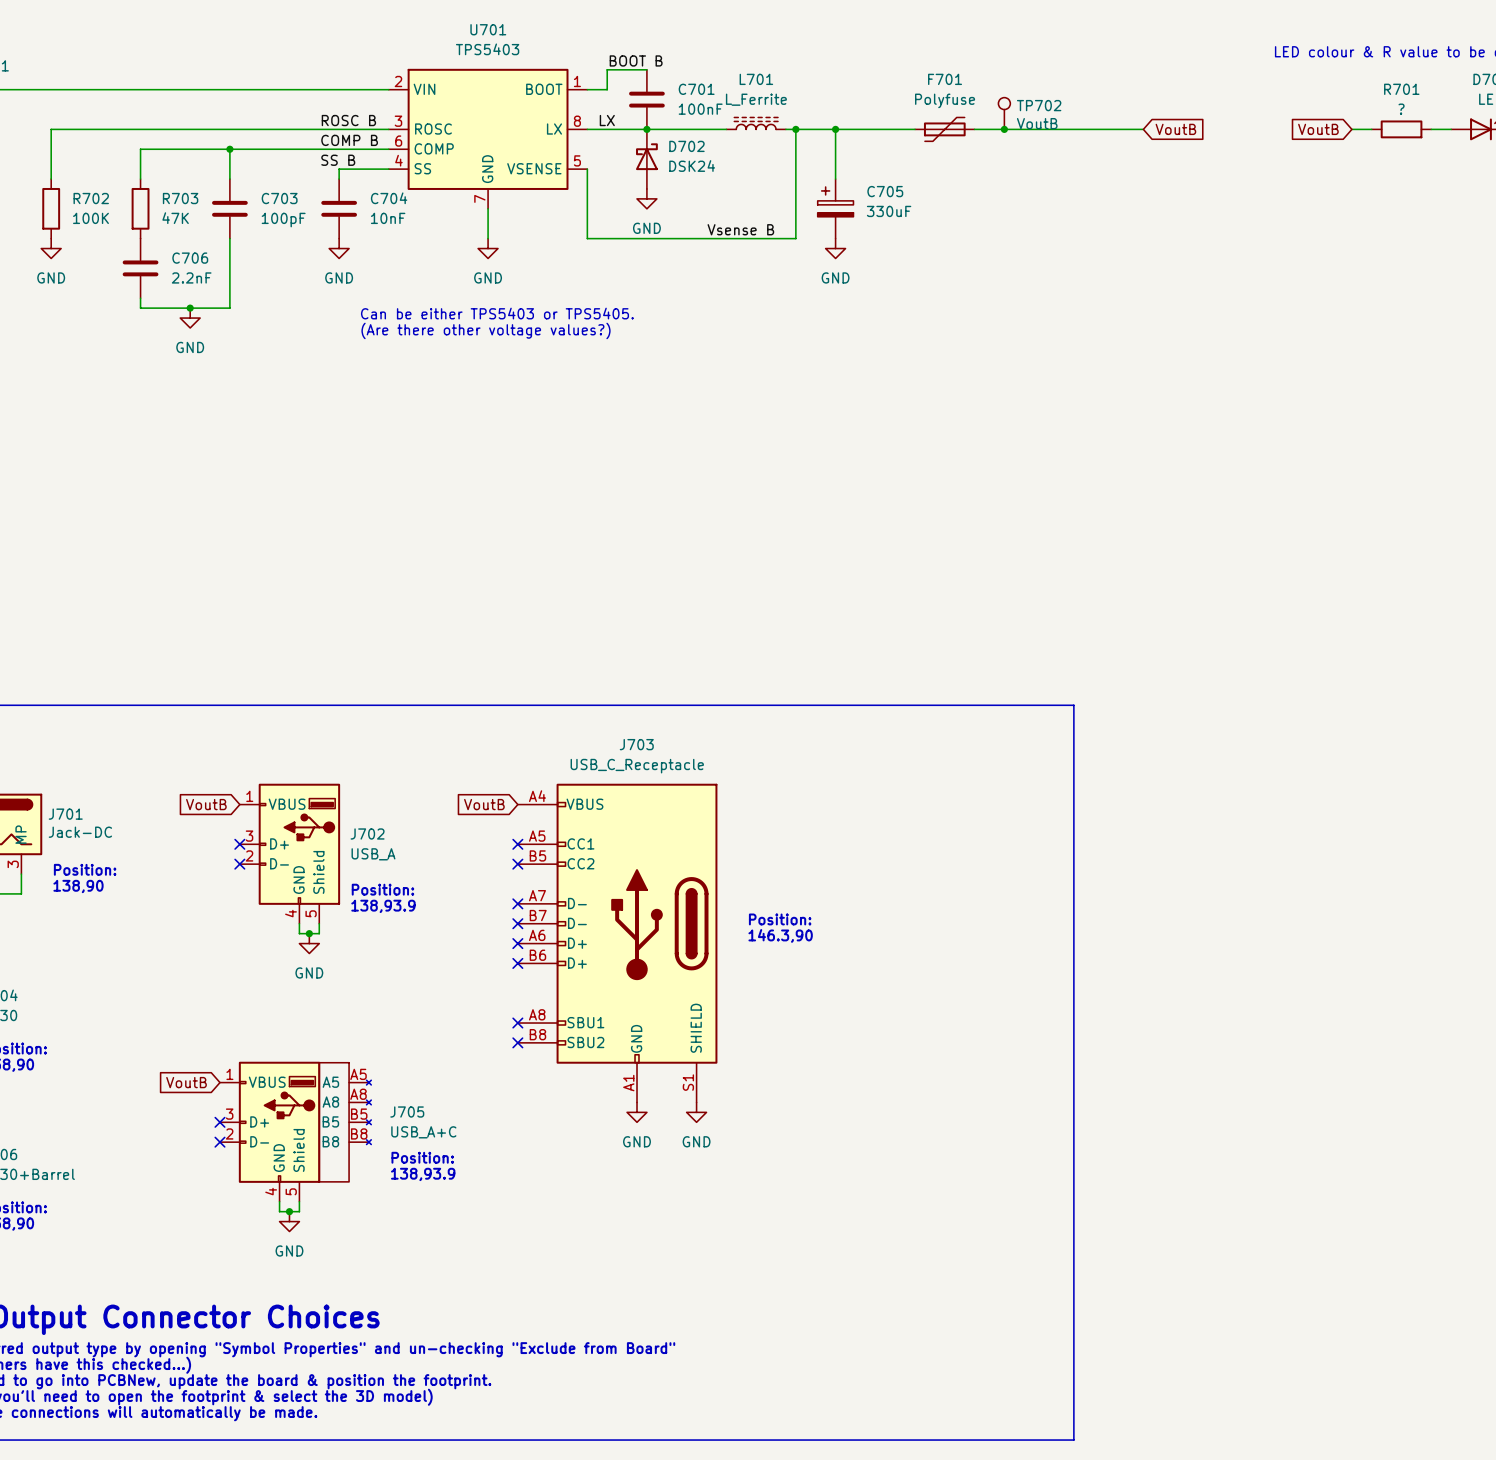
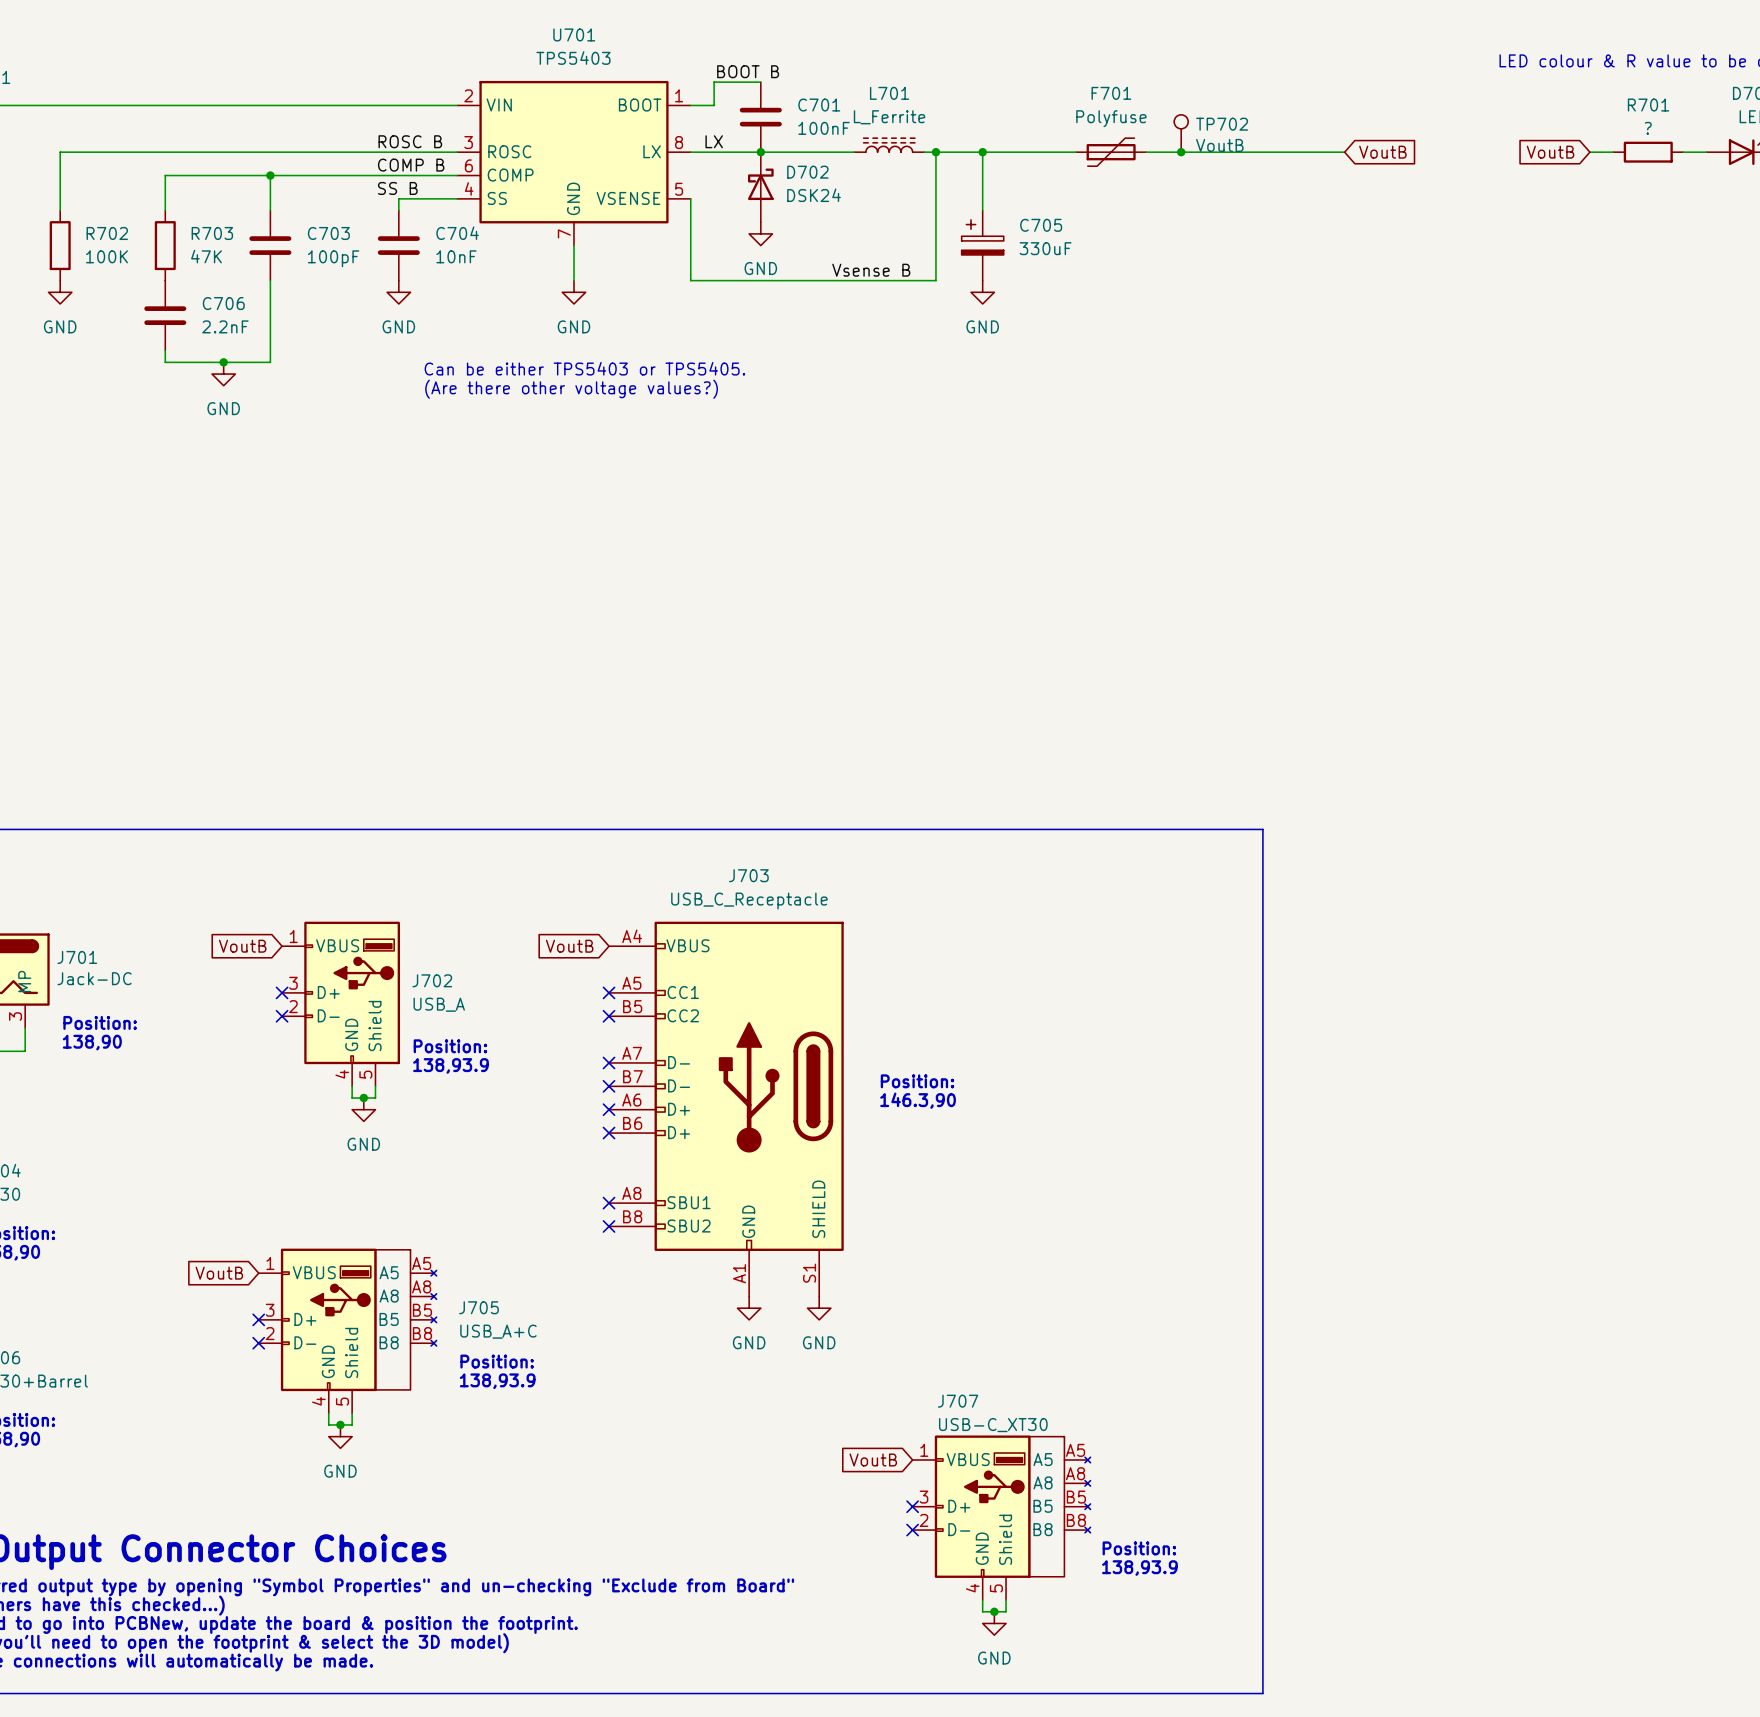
global label: none -> VoutB (873, 1459)
no-connect mark: none -> (912, 1506)
J707: none -> USB-C_XT30 (1001, 1517)
no-connect mark: none -> (912, 1530)
text: none -> Position: (1139, 1548)
text: none -> 138,93.9 (1139, 1568)
wire: none -> (982, 1600) (982, 1611) (1006, 1611) (1006, 1600)
junction: none -> (994, 1611)
power symbol: none -> GND (994, 1623)

